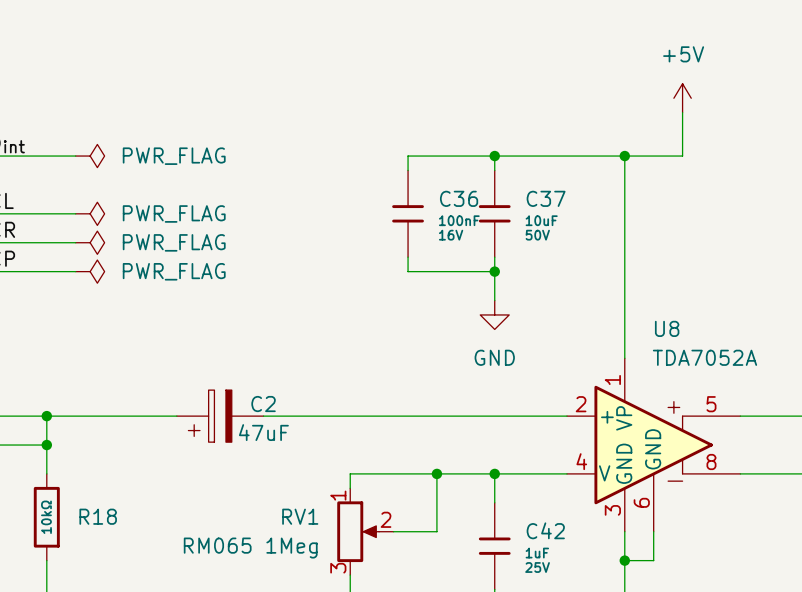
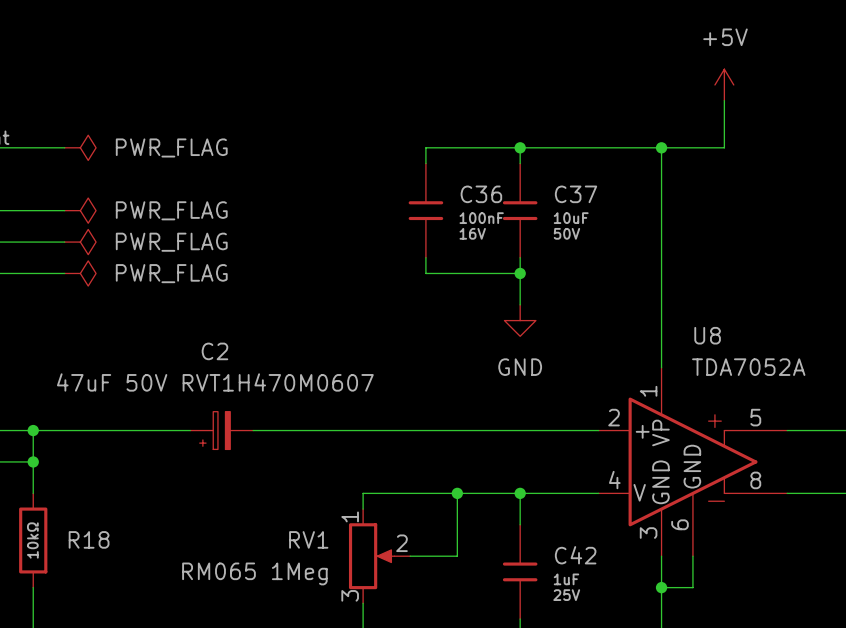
C2 symbol: [176, 390, 264, 443] -> [190, 411, 254, 450]
C2 name position: C2 (263, 404) -> C2 (214, 351)
C2 value: 47uF (263, 432) -> 47uF 50V RVT1H470M0607 (215, 382)

